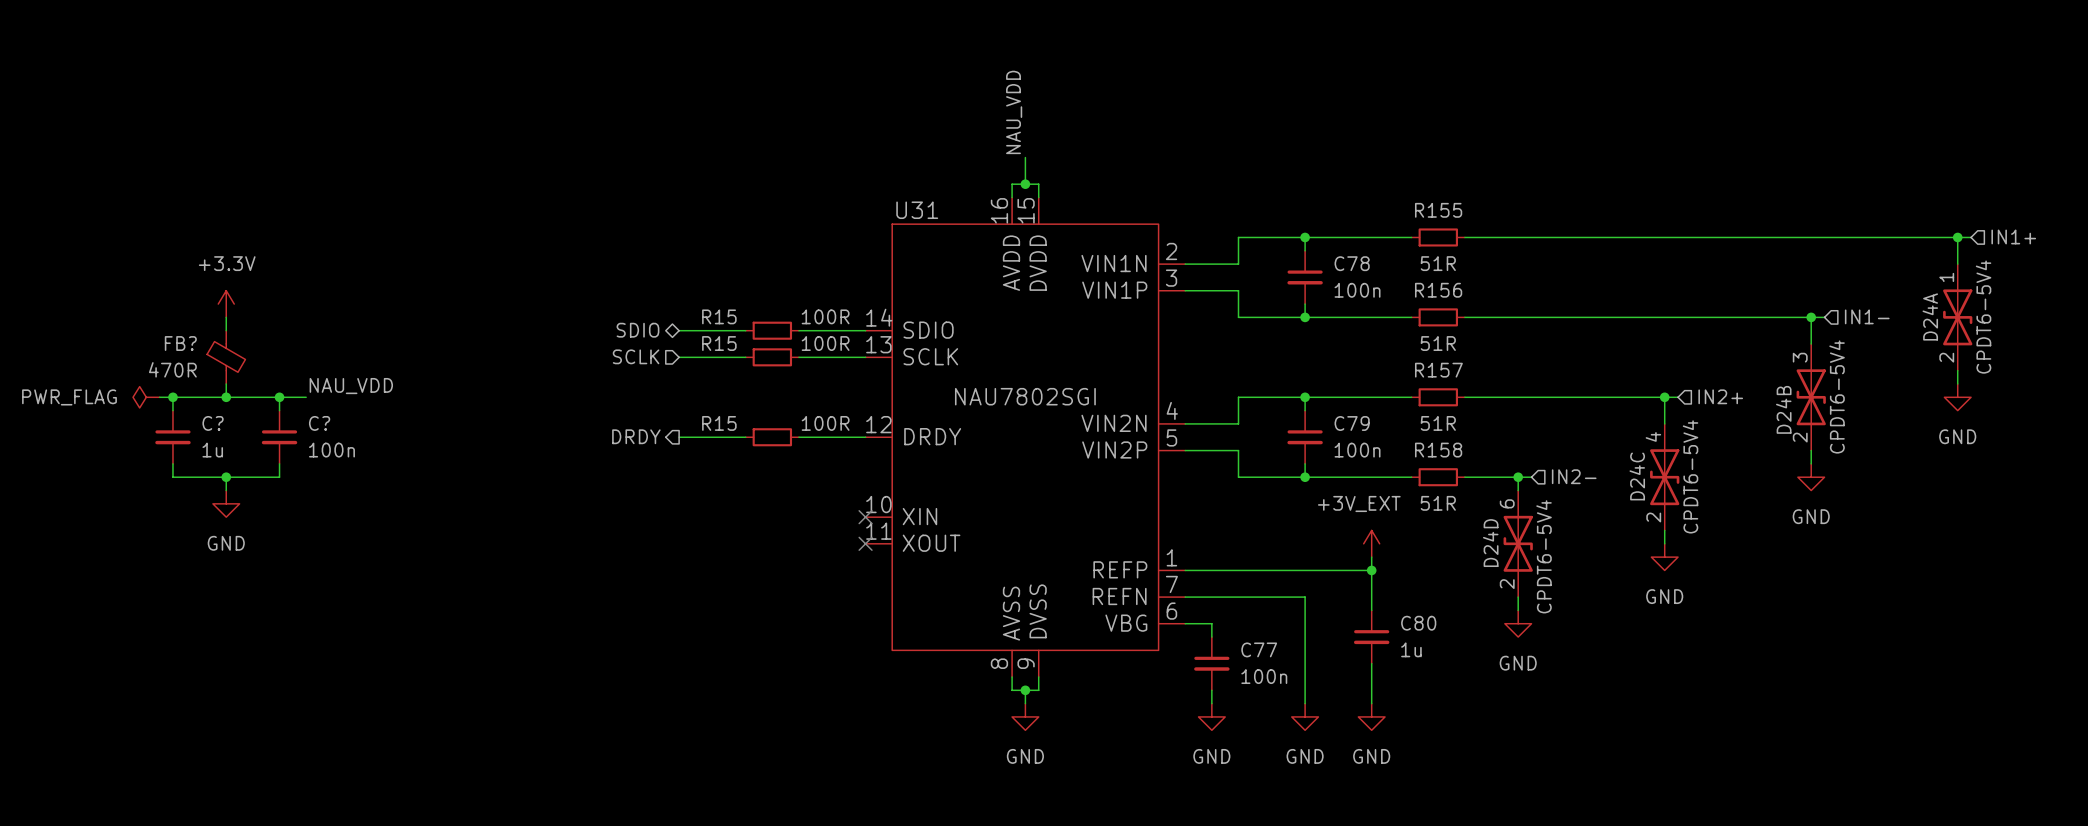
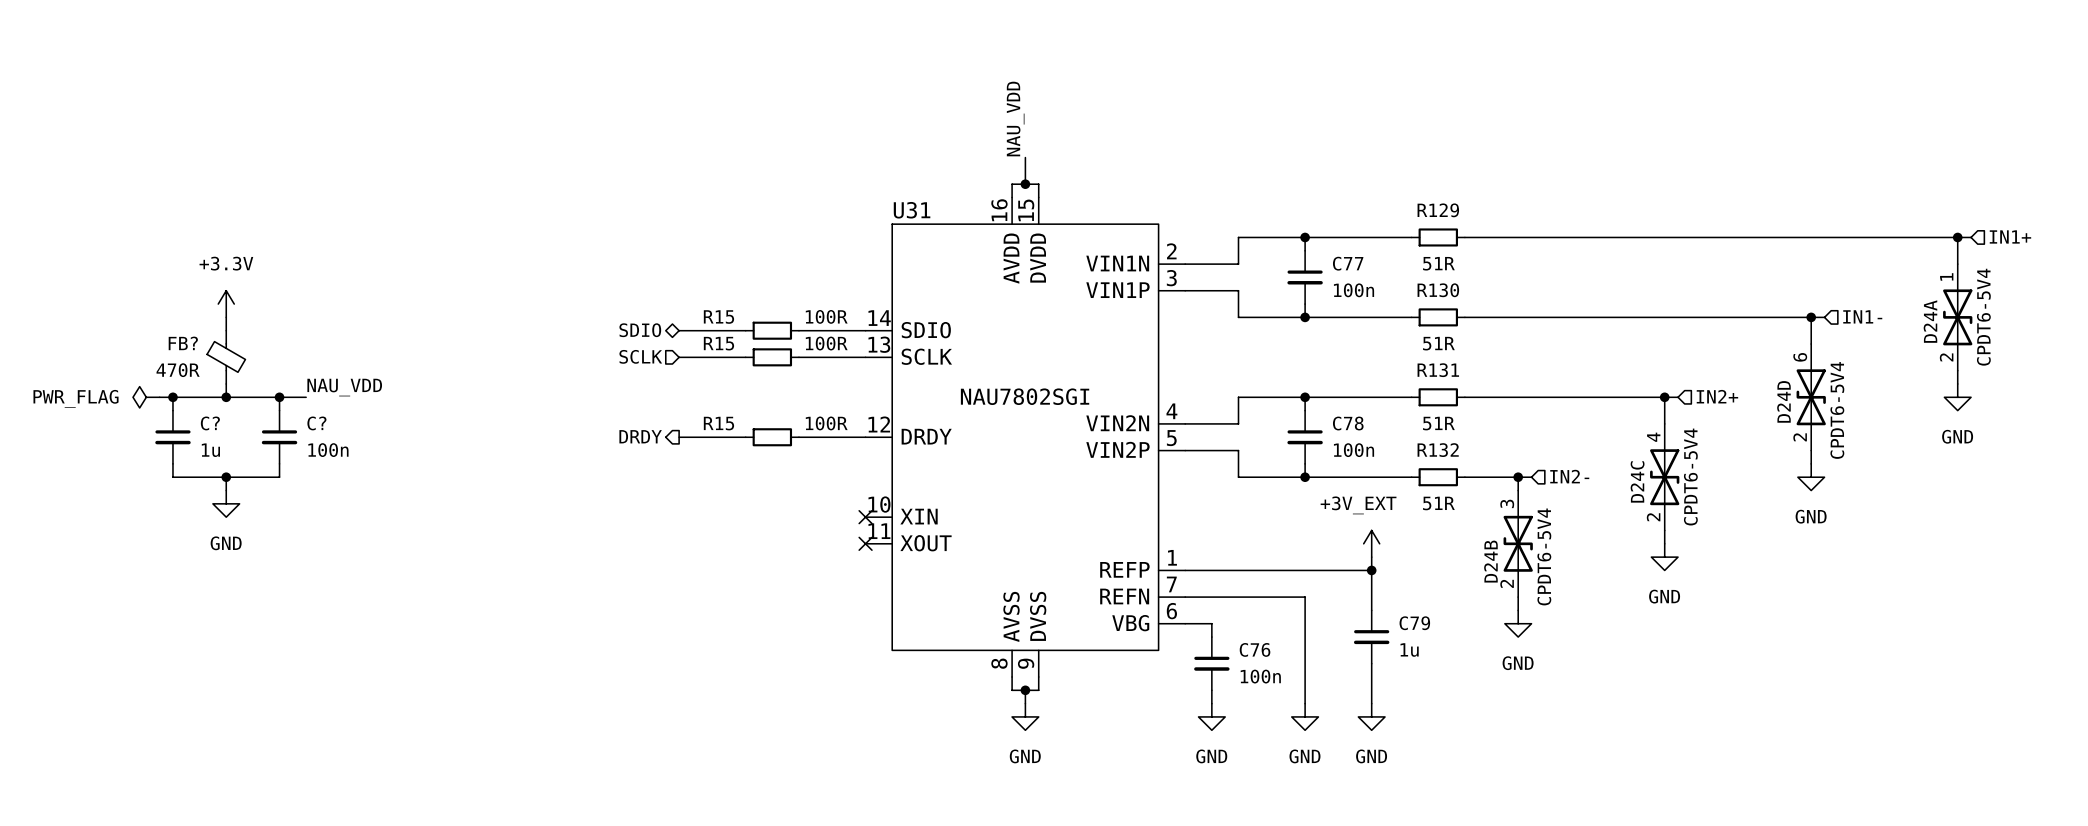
R155 name: R155 (1438, 210) -> R129 (1438, 210)
C78 name: C78 (1352, 263) -> C77 (1348, 263)
R156 name: R156 (1438, 290) -> R130 (1438, 290)
R157 name: R157 (1438, 370) -> R131 (1438, 370)
D24B value position: CPDT6-5V4 (1837, 396) -> CPDT6-5V4 (1544, 556)
D24B position: (1811, 397) -> (1518, 543)
C79 name: C79 (1352, 423) -> C78 (1348, 423)
R158 name: R158 (1438, 450) -> R132 (1438, 450)
D24D position: (1518, 543) -> (1811, 397)
C80 name: C80 (1418, 623) -> C79 (1414, 623)
C77 name: C77 (1259, 649) -> C76 (1255, 649)

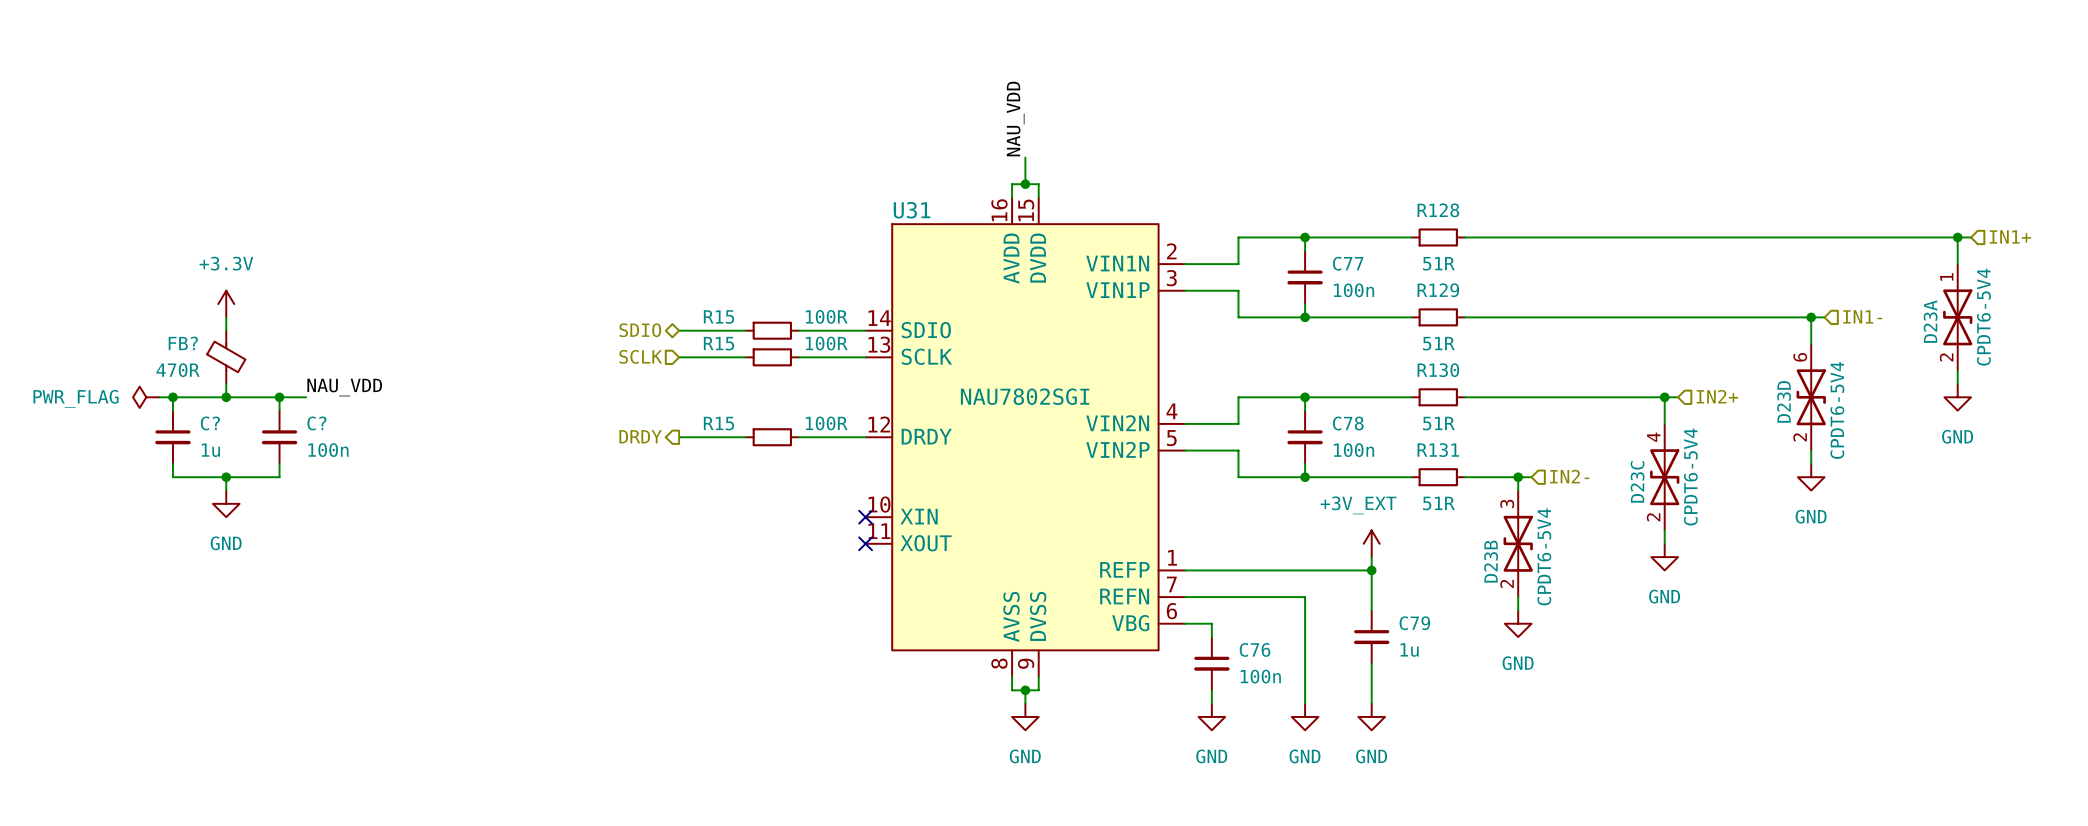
R129 name: R129 (1438, 210) -> R128 (1438, 210)
R130 name: R130 (1438, 290) -> R129 (1438, 290)
D24A name: D24A (1930, 321) -> D23A (1930, 321)
R131 name: R131 (1438, 370) -> R130 (1438, 370)
D24D name: D24D (1783, 401) -> D23D (1784, 401)
R132 name: R132 (1438, 450) -> R131 (1438, 450)
D24C name: D24C (1637, 481) -> D23C (1637, 481)
D24B name: D24B (1490, 561) -> D23B (1491, 561)

